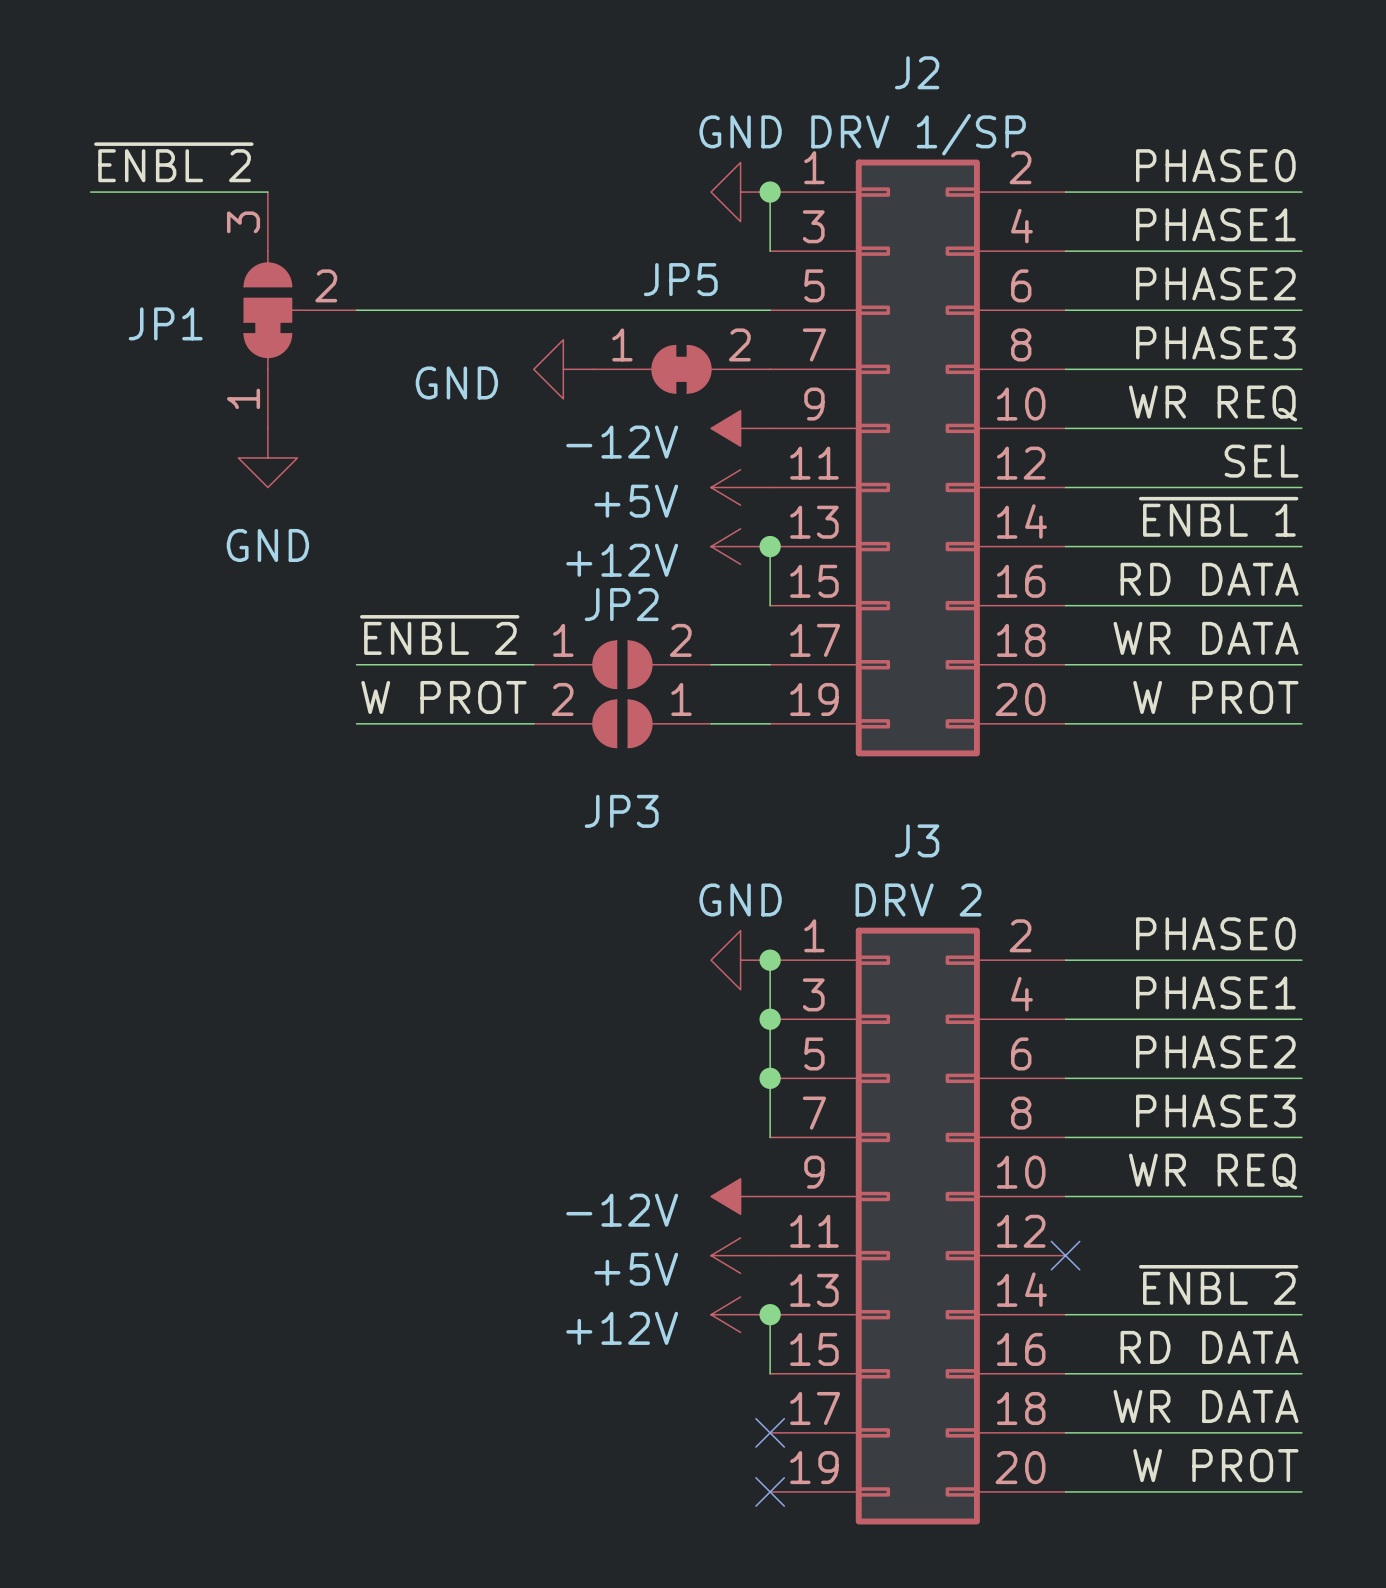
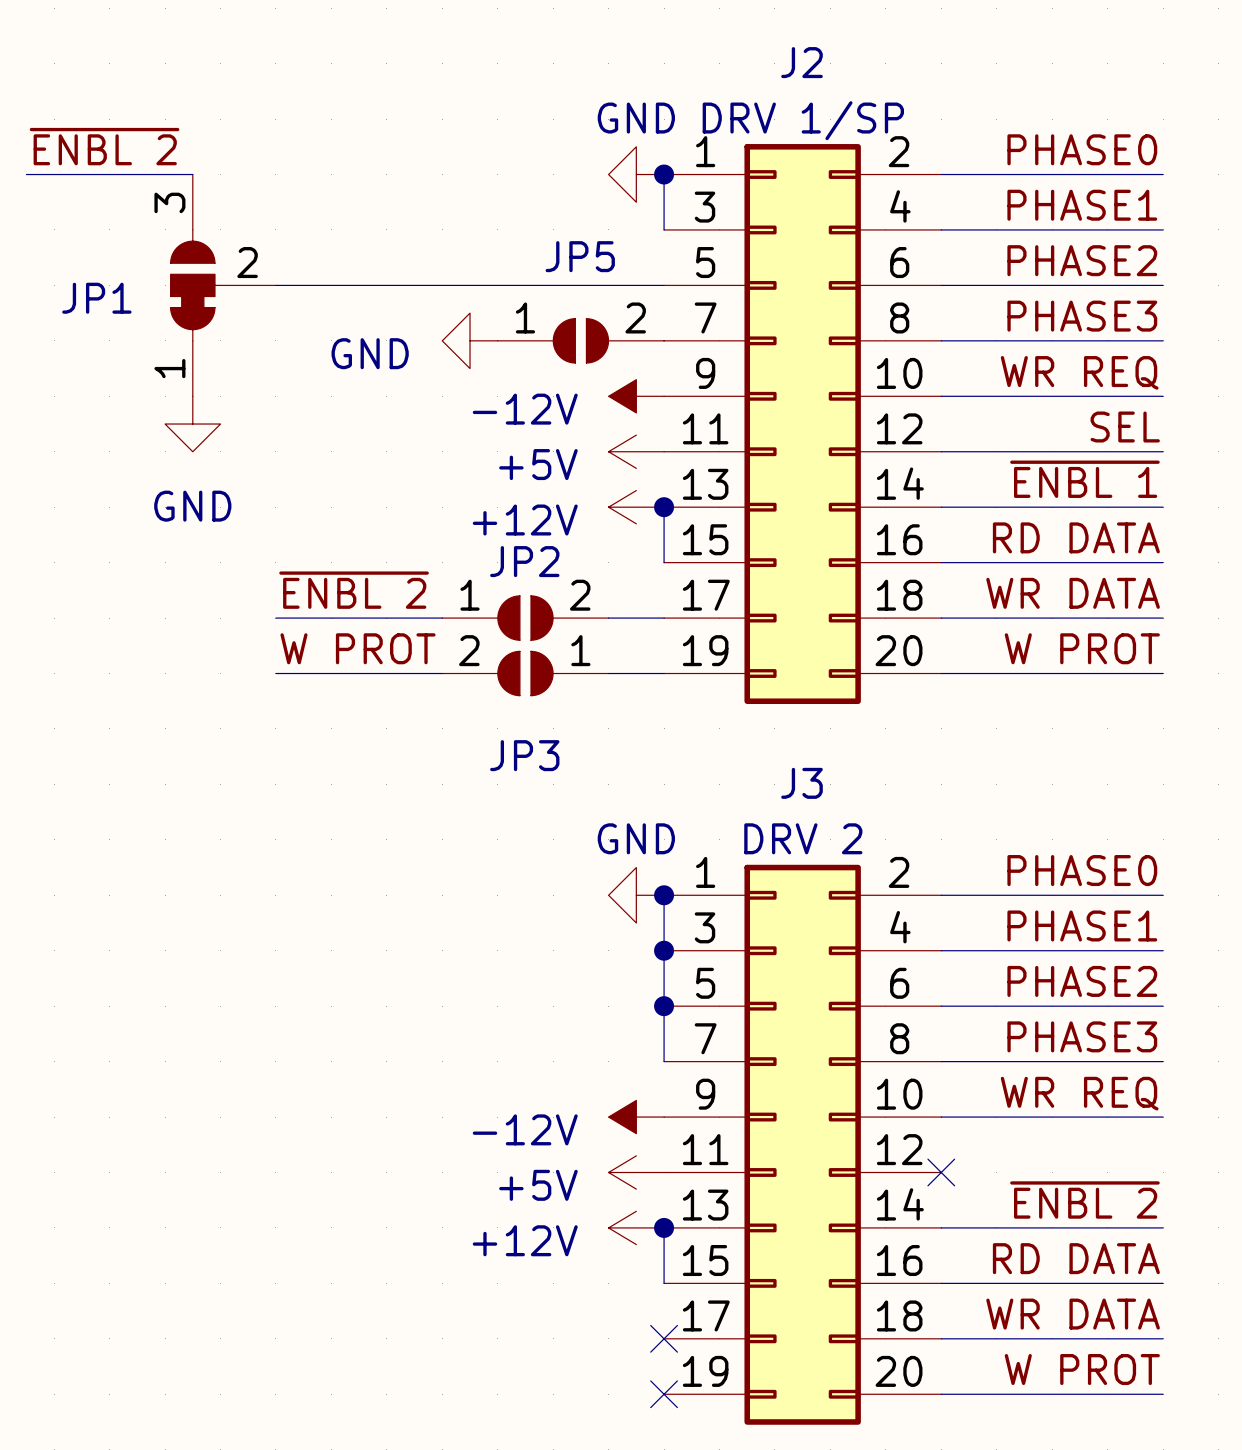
JP5 symbol: [592, 345, 771, 393] -> [497, 318, 665, 364]

